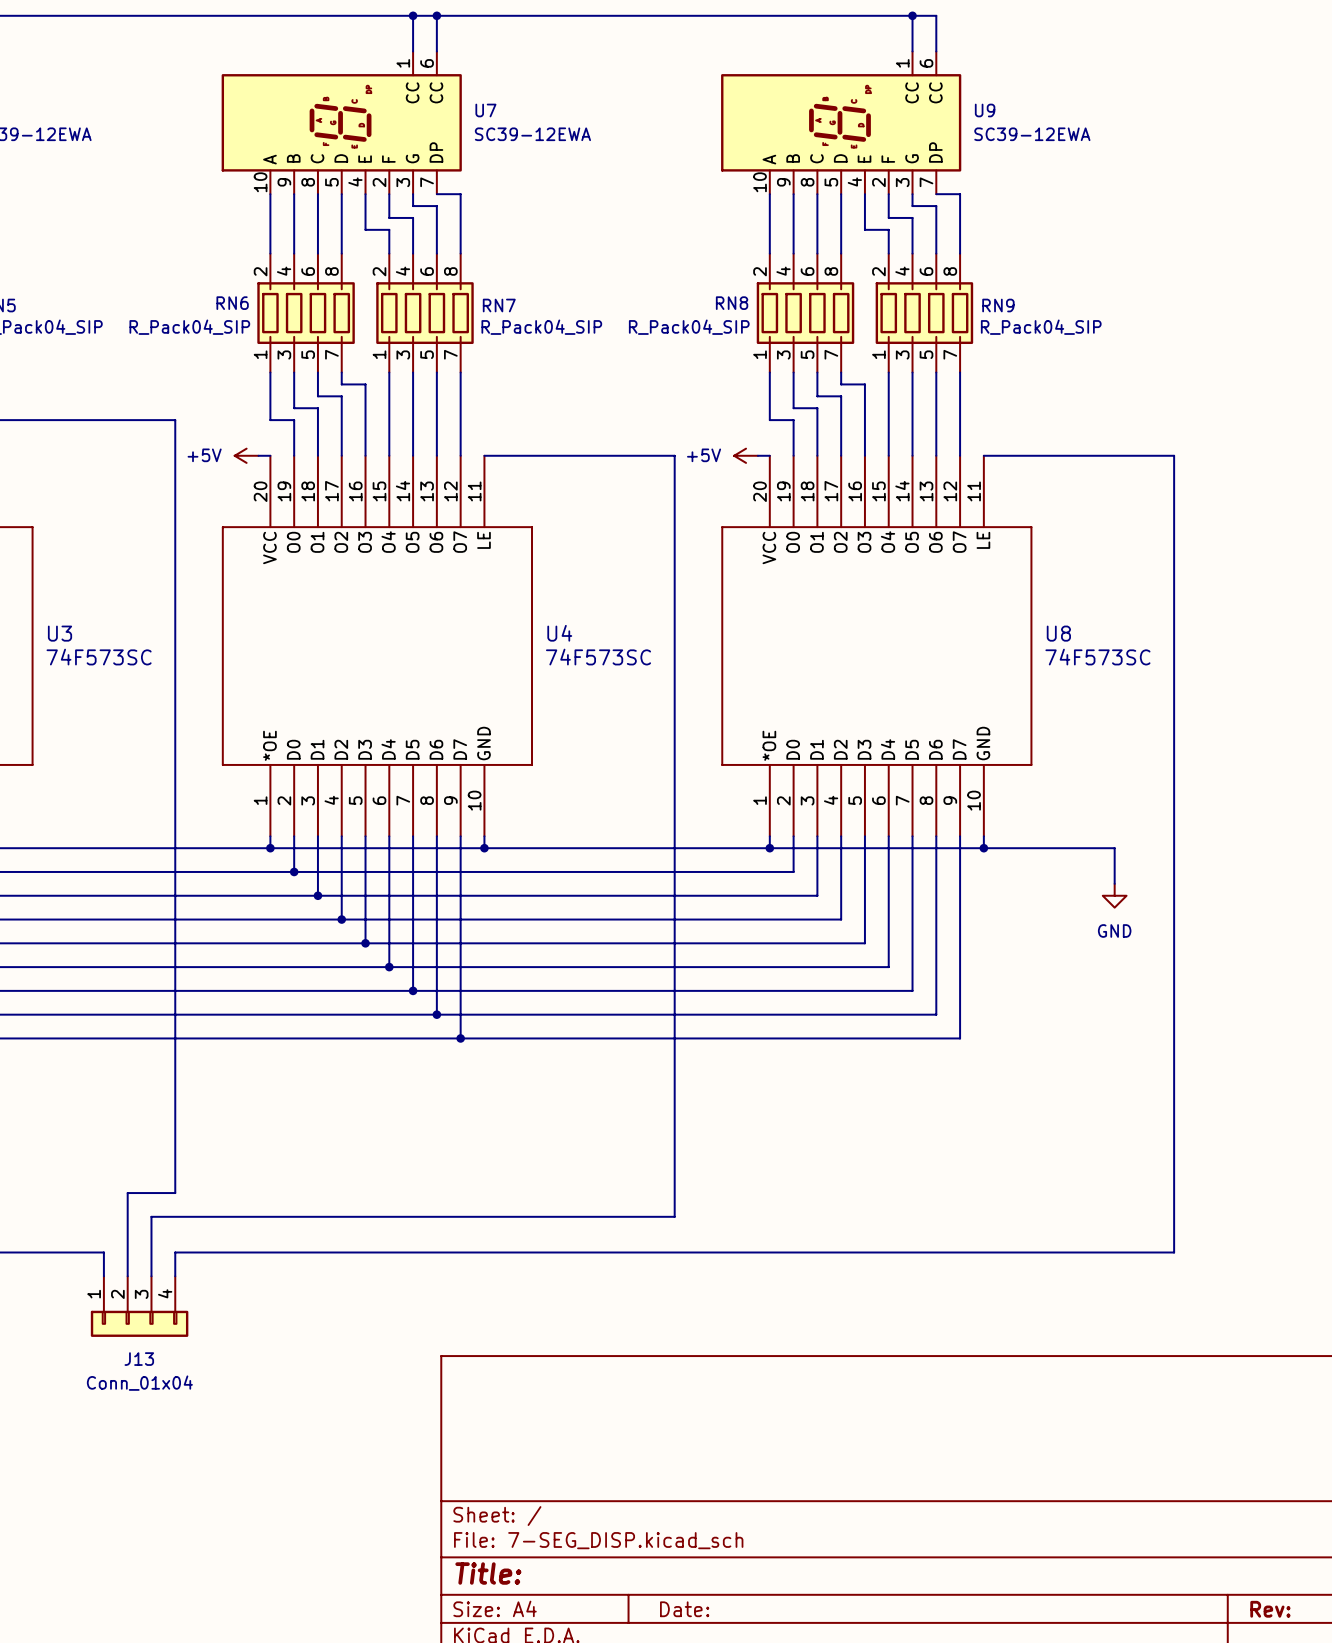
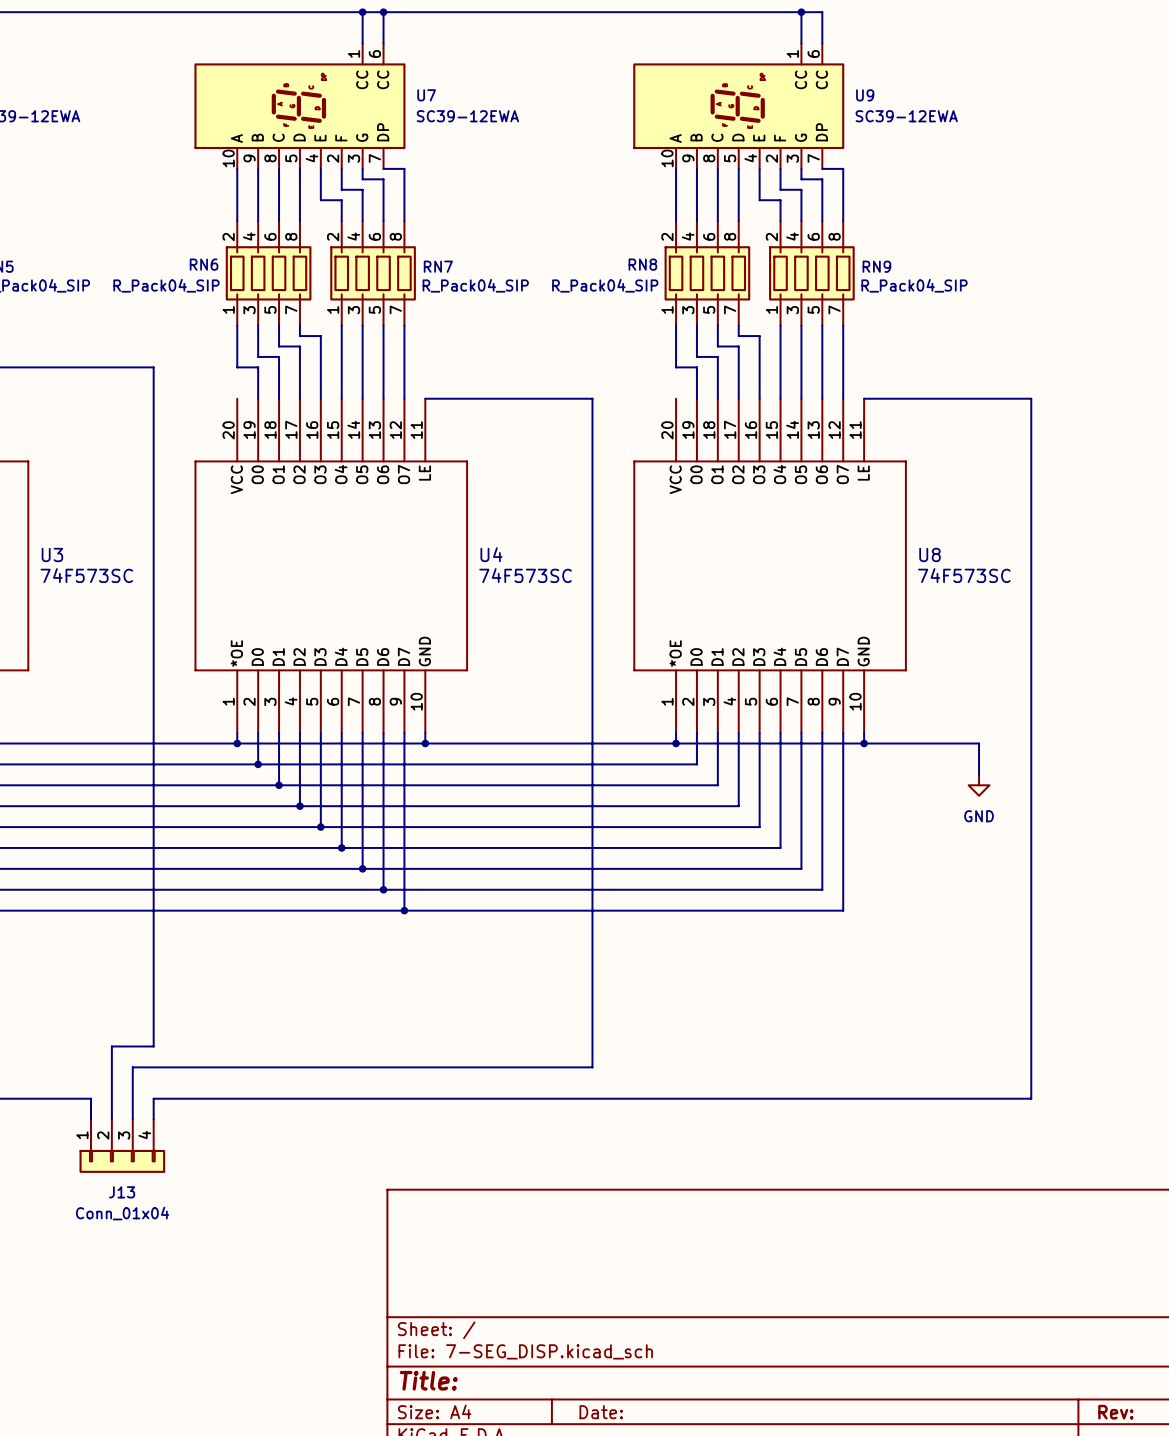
power symbol: +5V (246, 455) -> none
wire: (258, 455) (270, 455) -> none
power symbol: +5V (746, 455) -> none
wire: (757, 455) (769, 455) -> none

